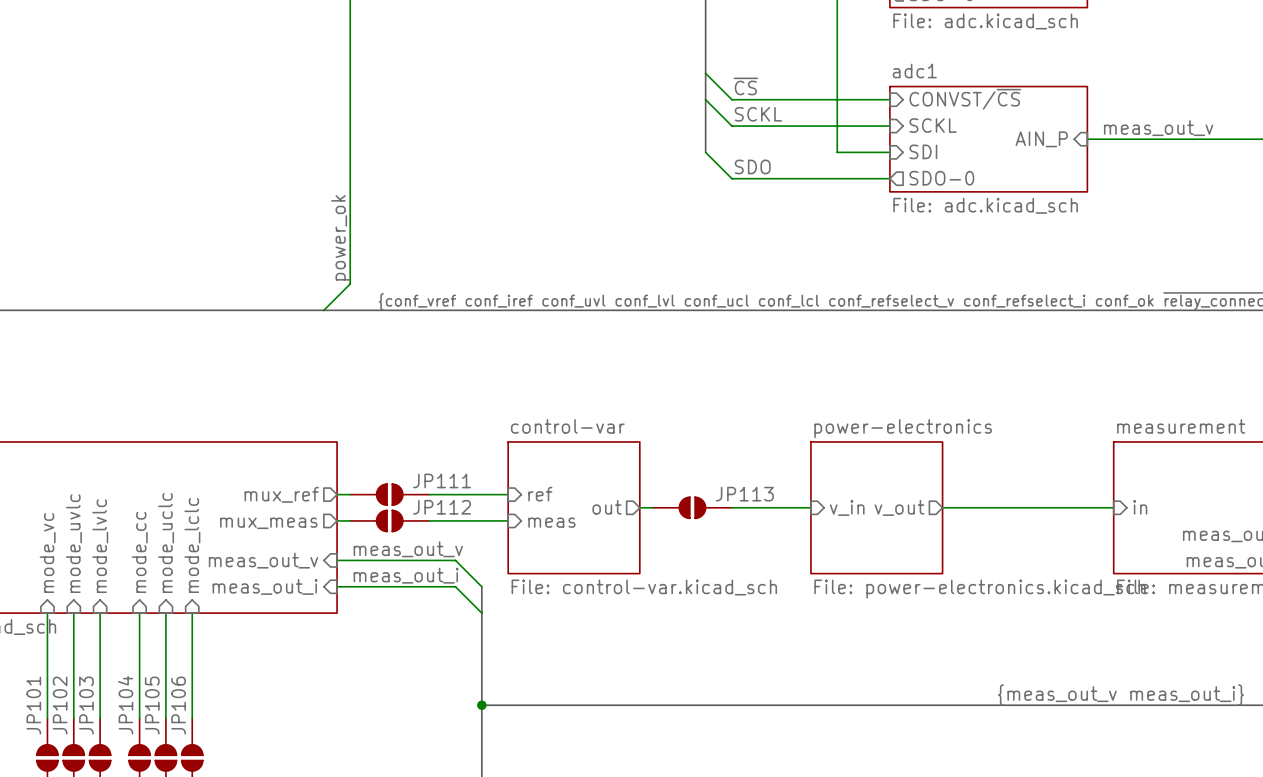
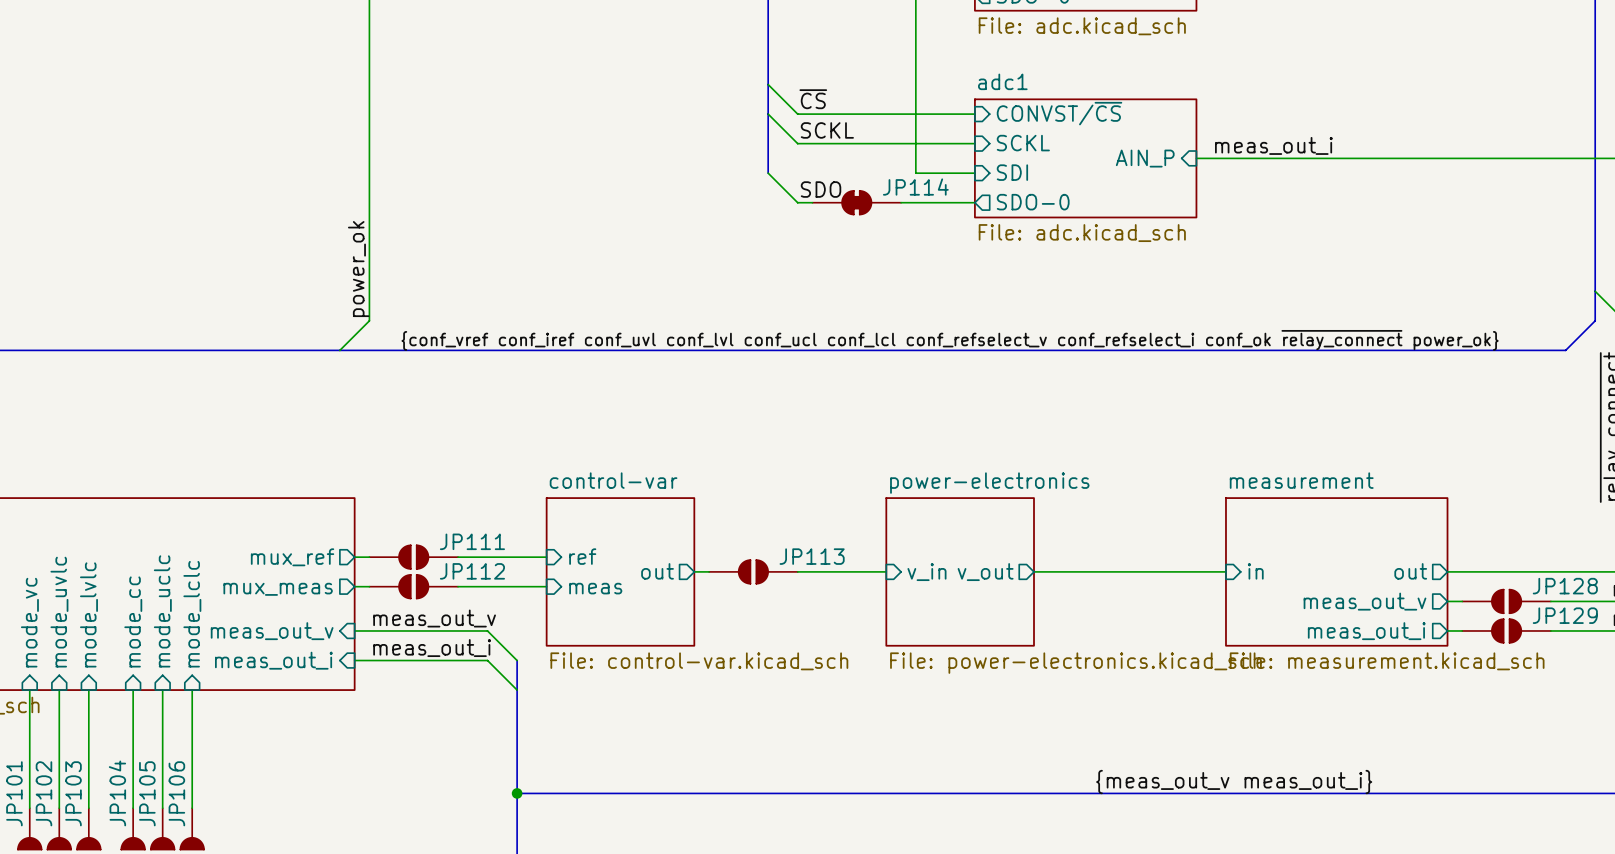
label: meas_out_v (1158, 128) -> meas_out_i (1273, 145)
JP114: none -> (856, 202)

